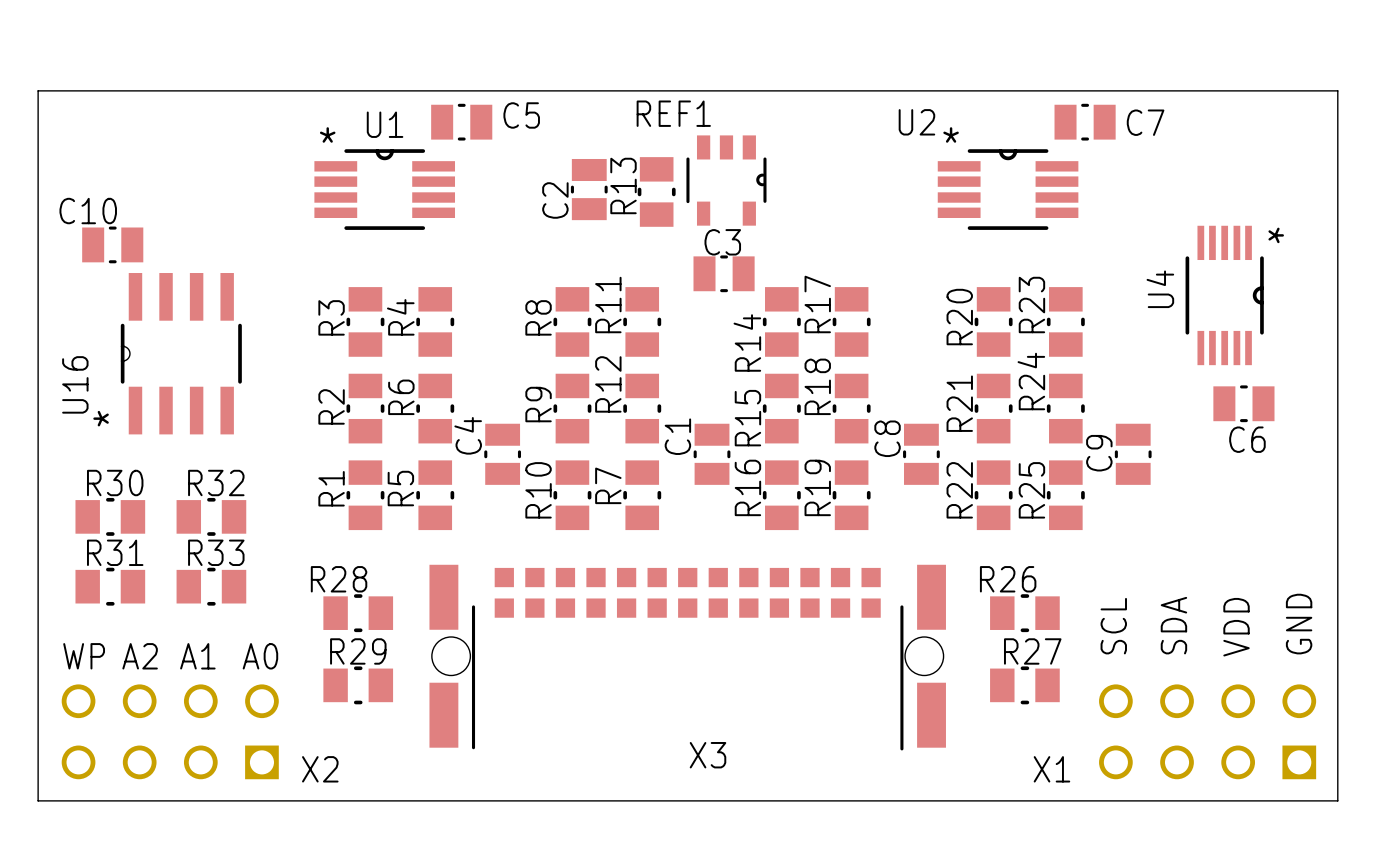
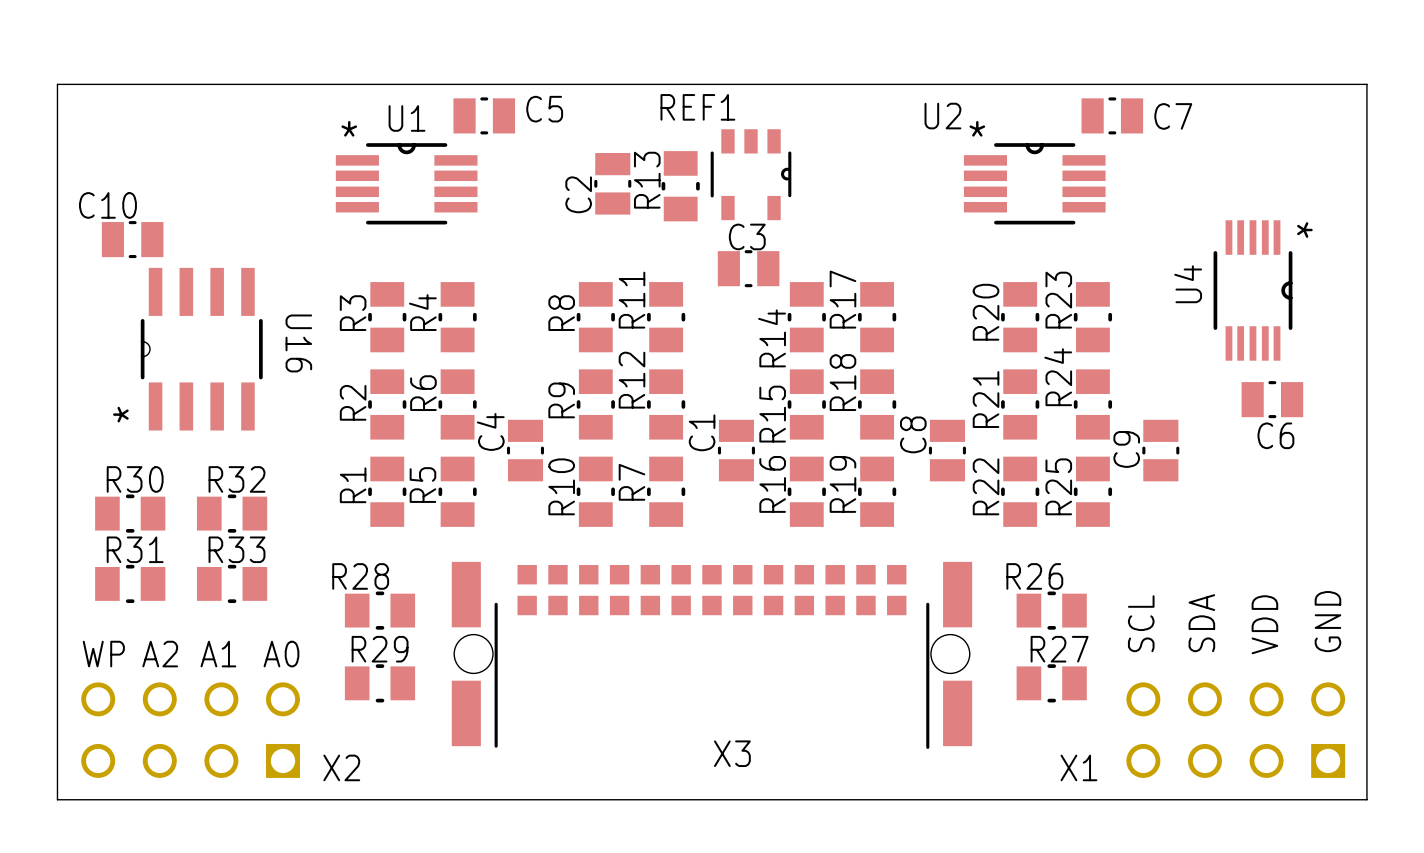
U16 name rotation: 0° (75, 384) -> 180° (298, 343)
U16 name position: U16 (75, 384) -> U16 (298, 343)

